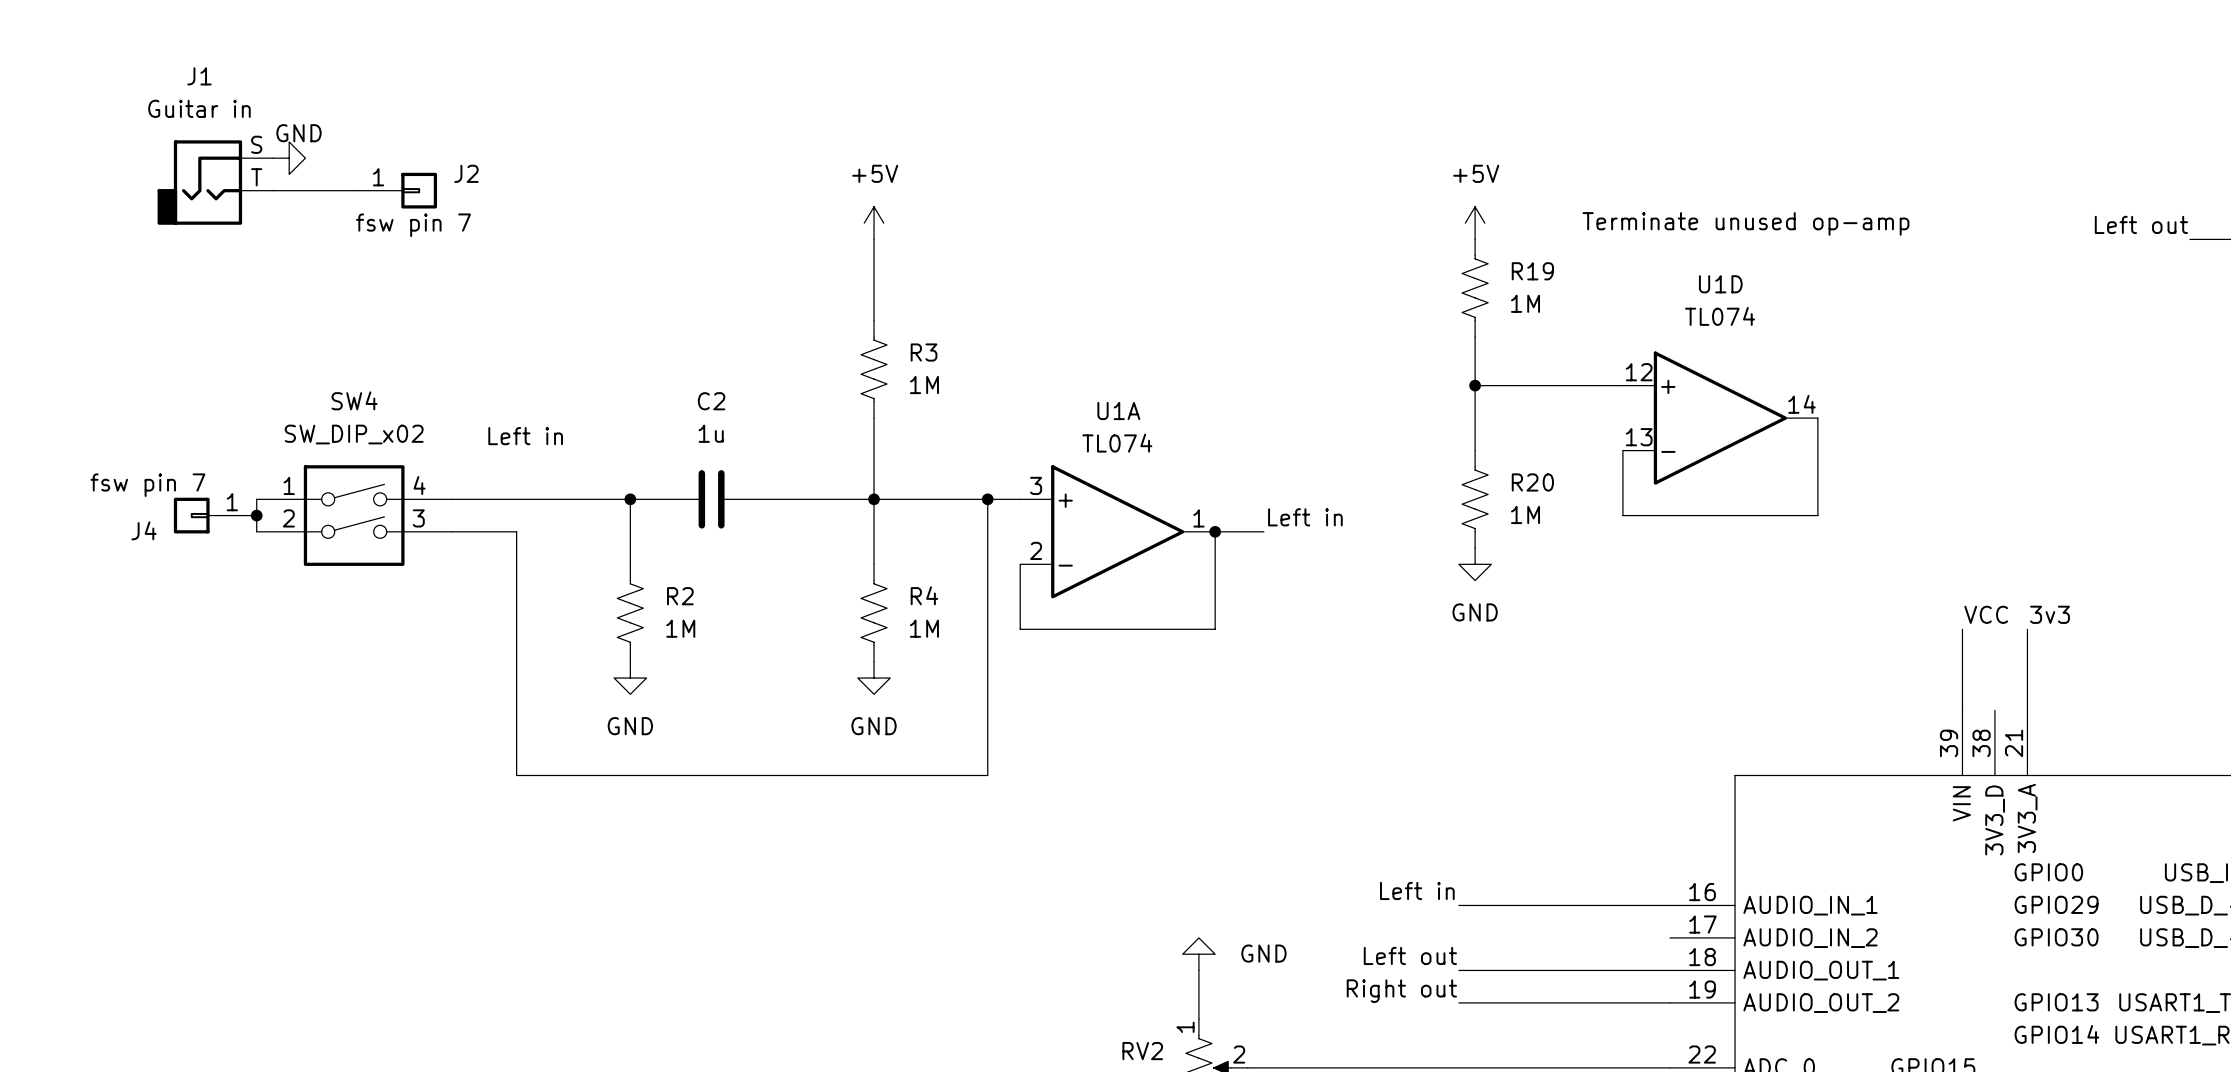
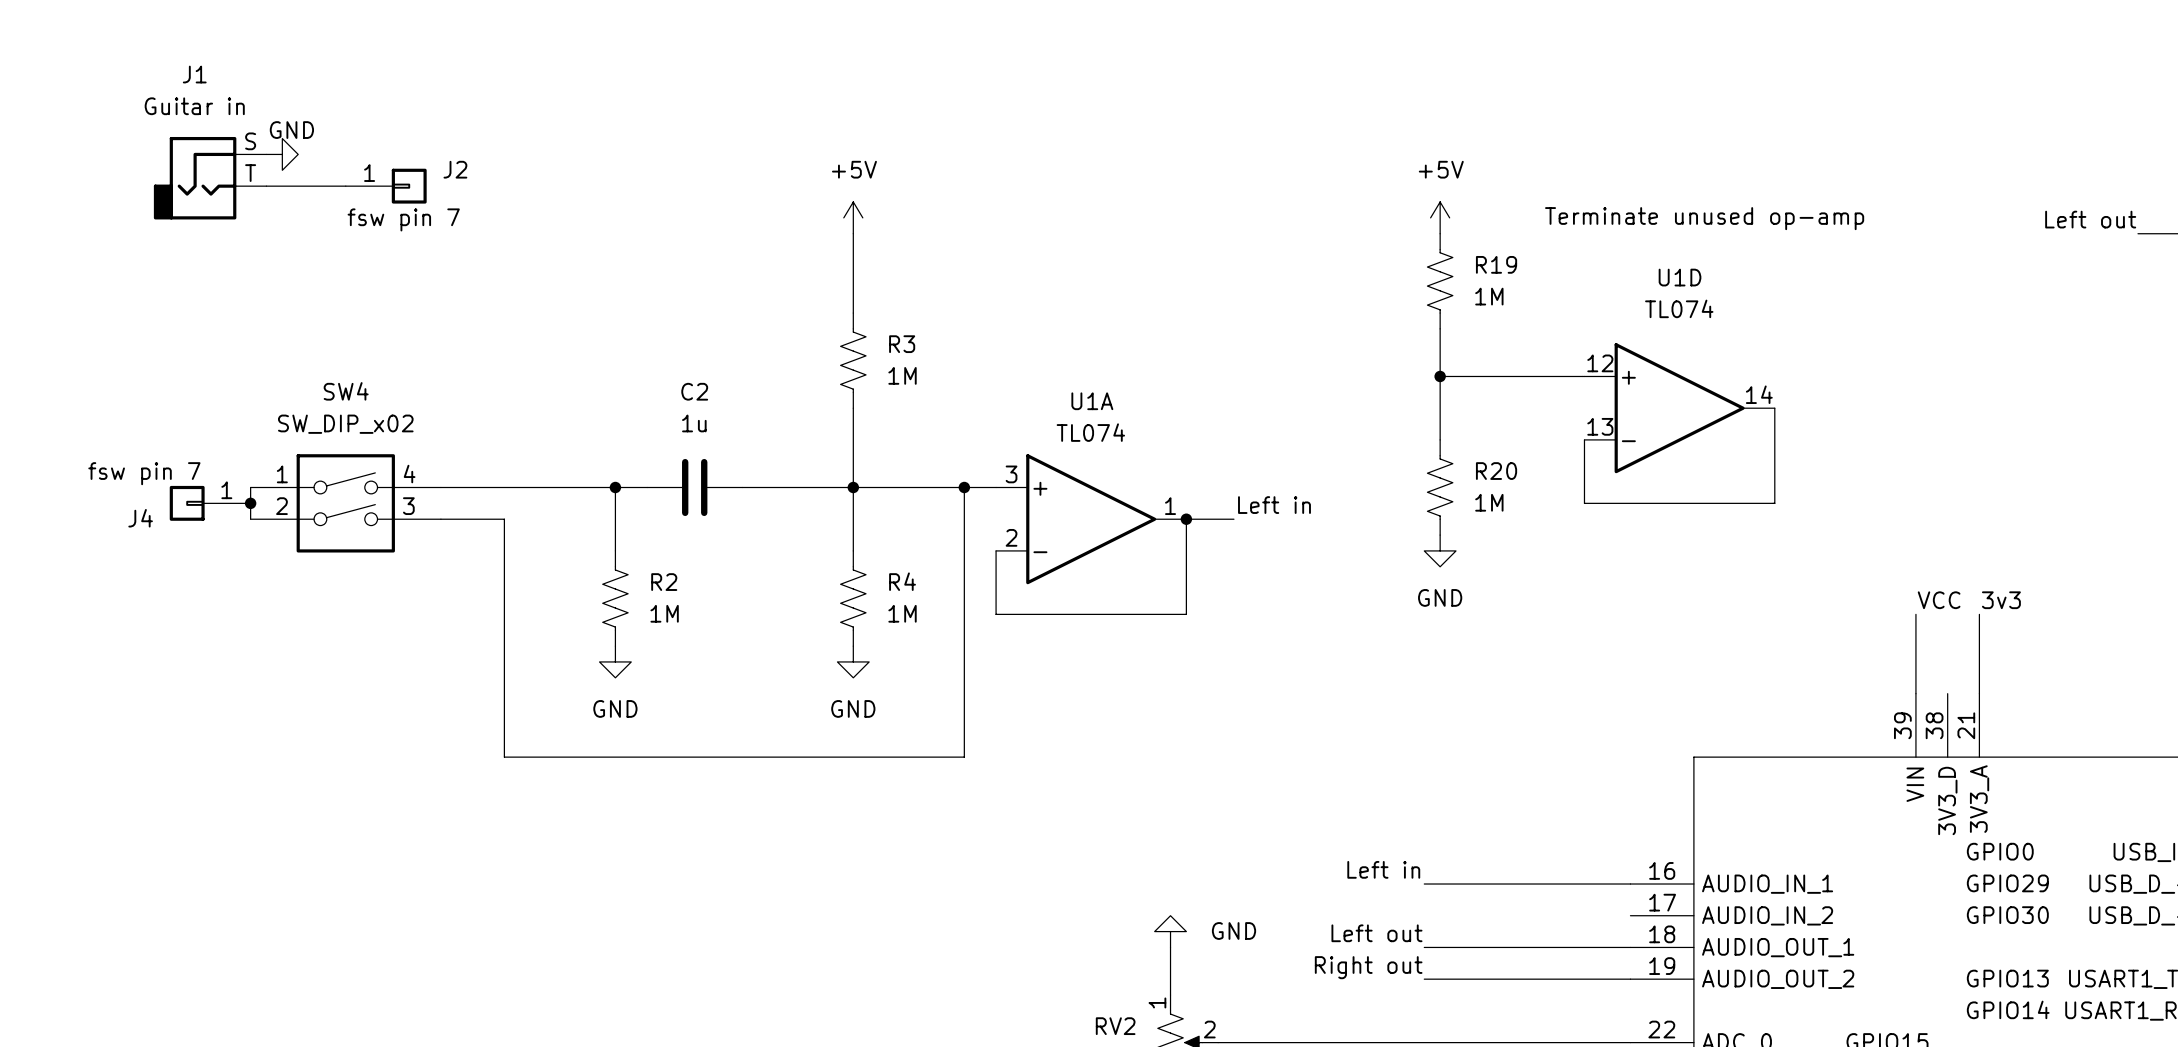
label: Left in (525, 436) -> none

